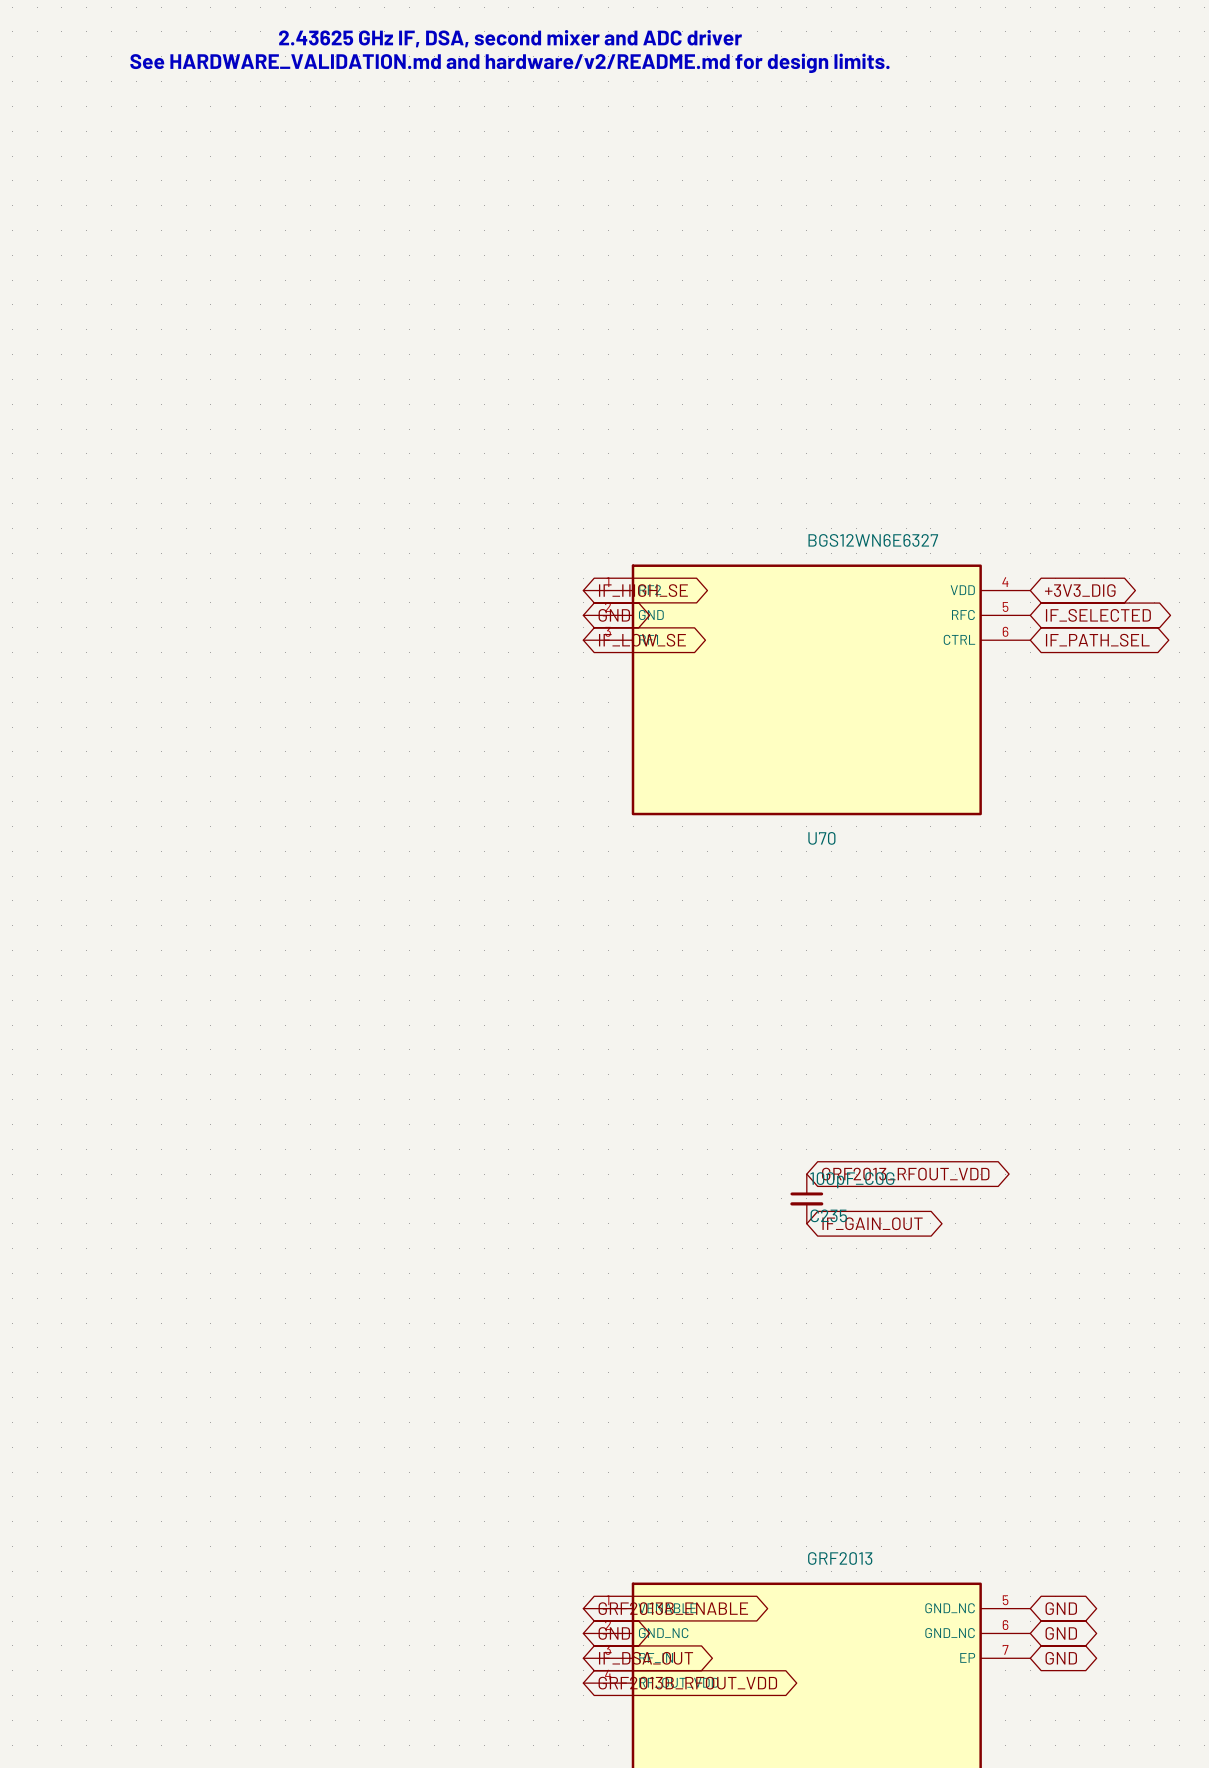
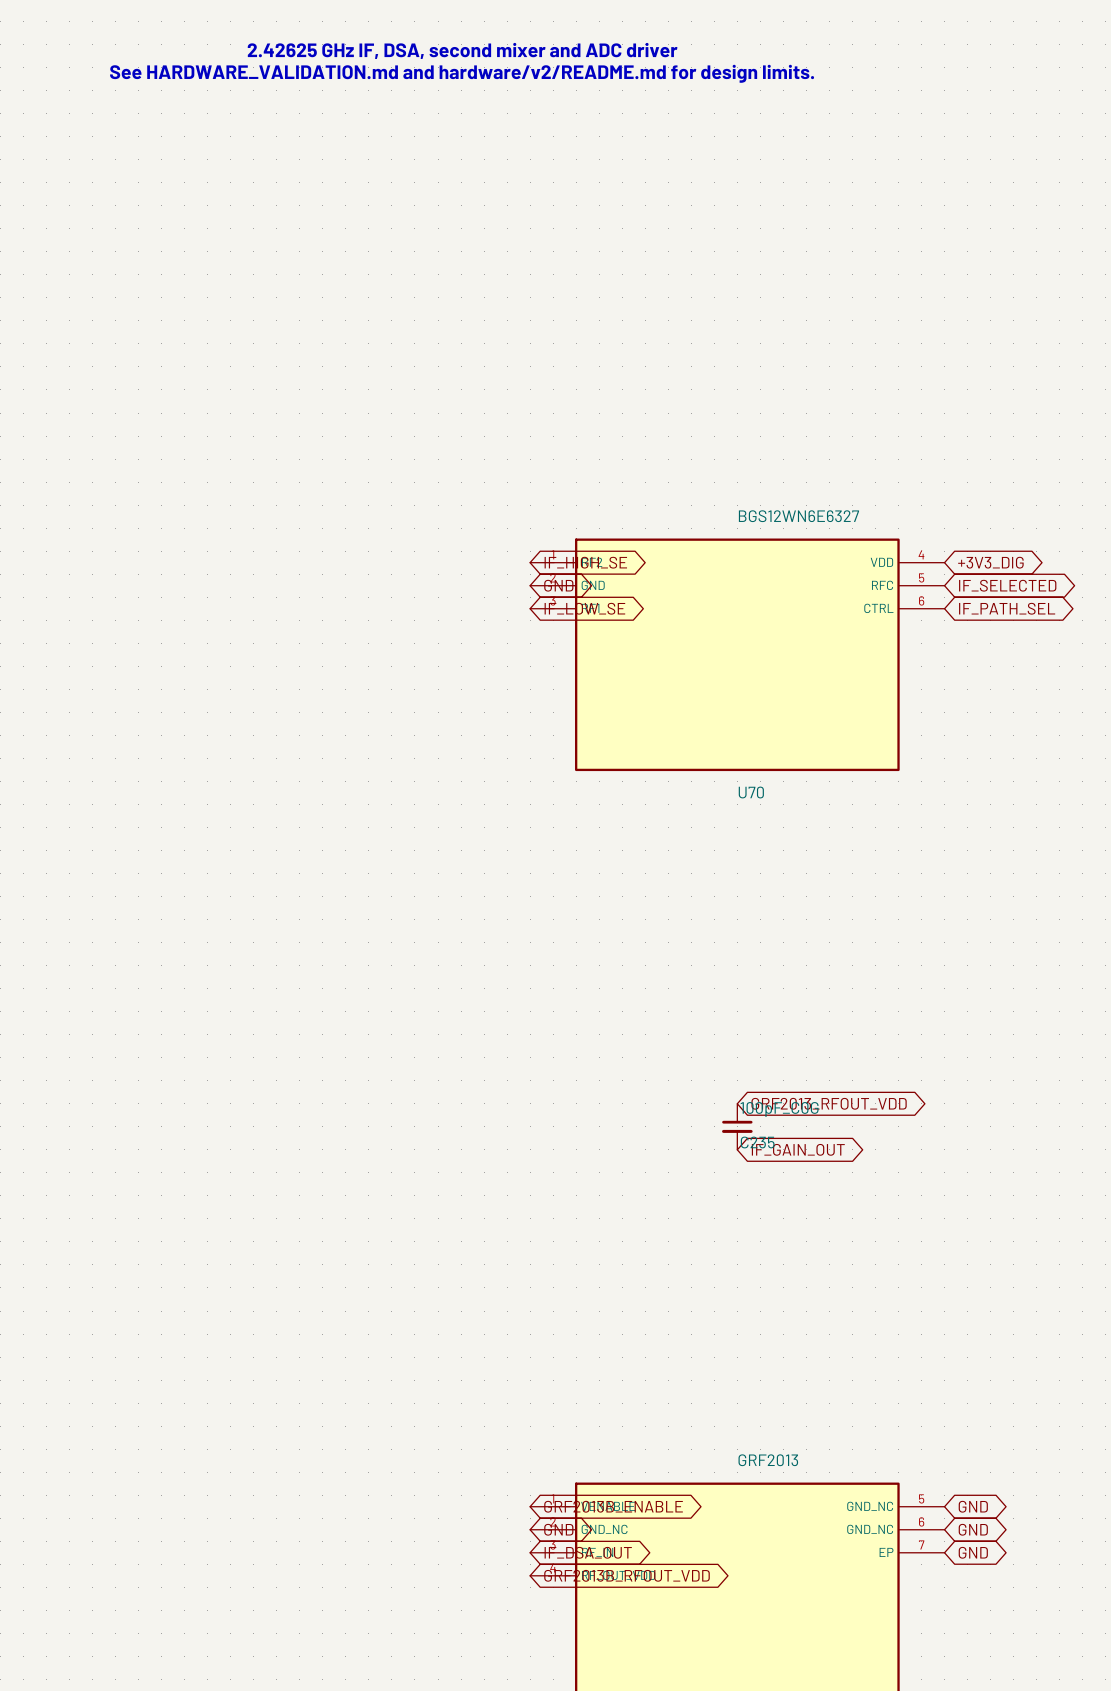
text: 2.43625 GHz IF, DSA, second mixer and ADC driver (510, 38) -> 2.42625 GHz IF, DSA, second mixer and ADC driver (462, 50)

